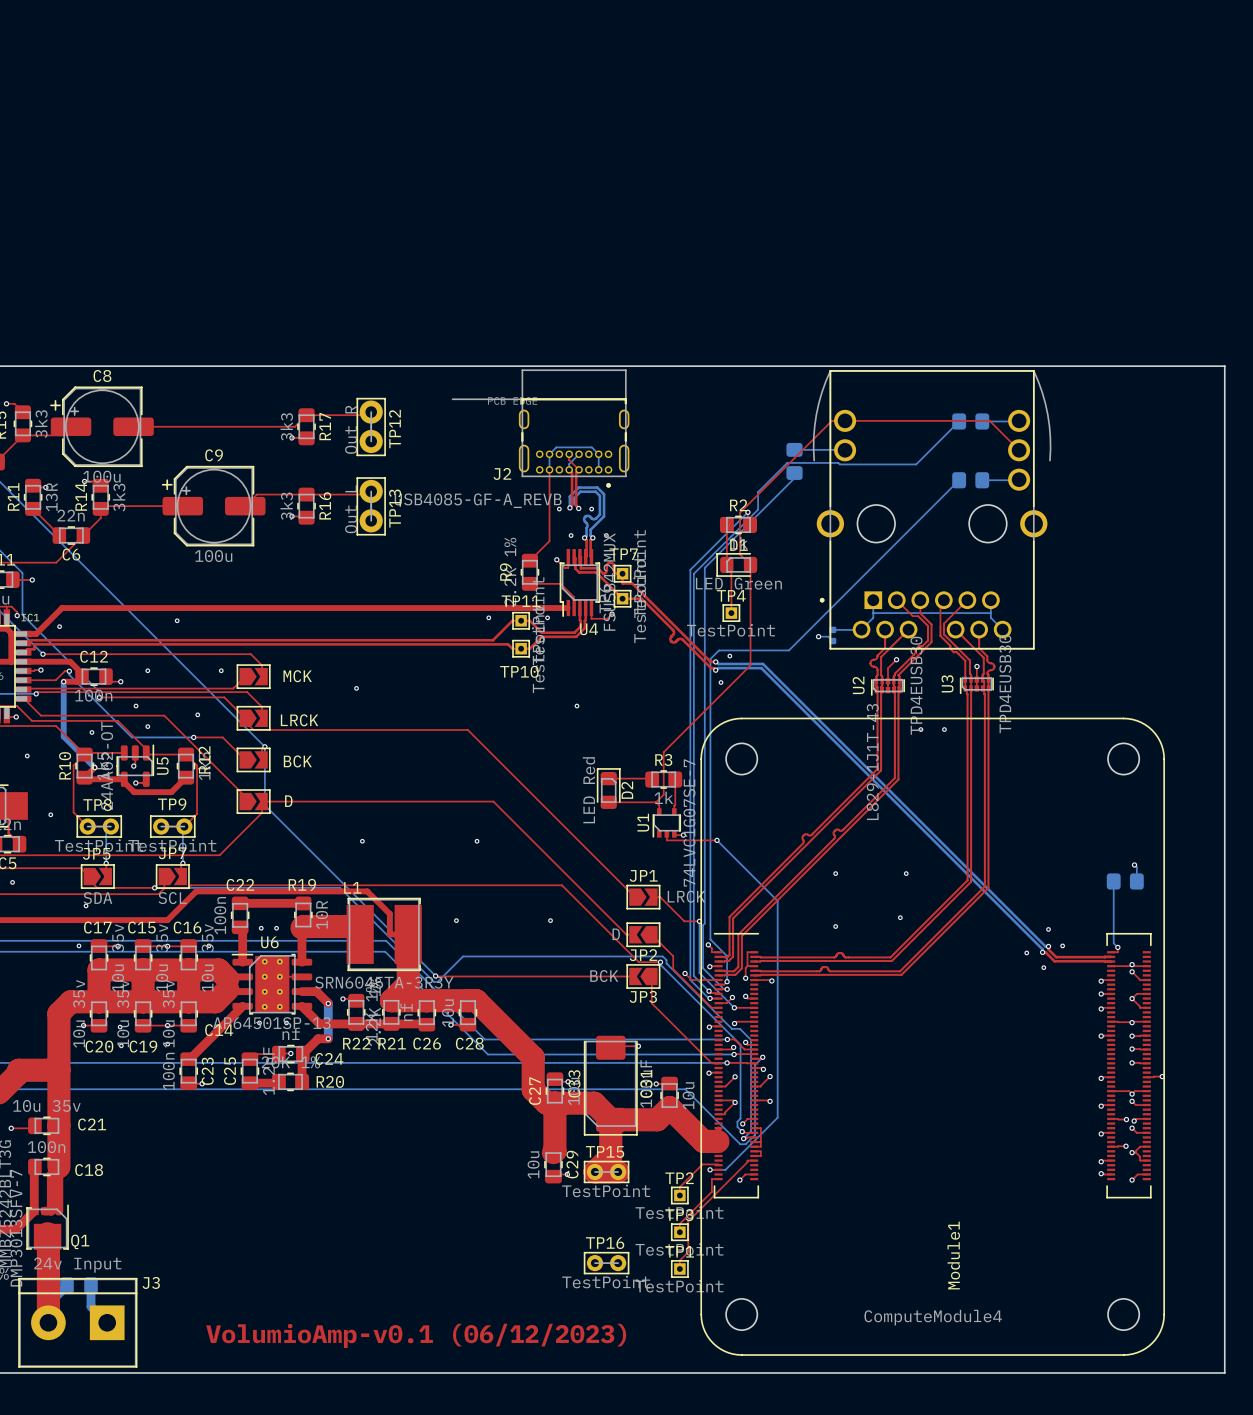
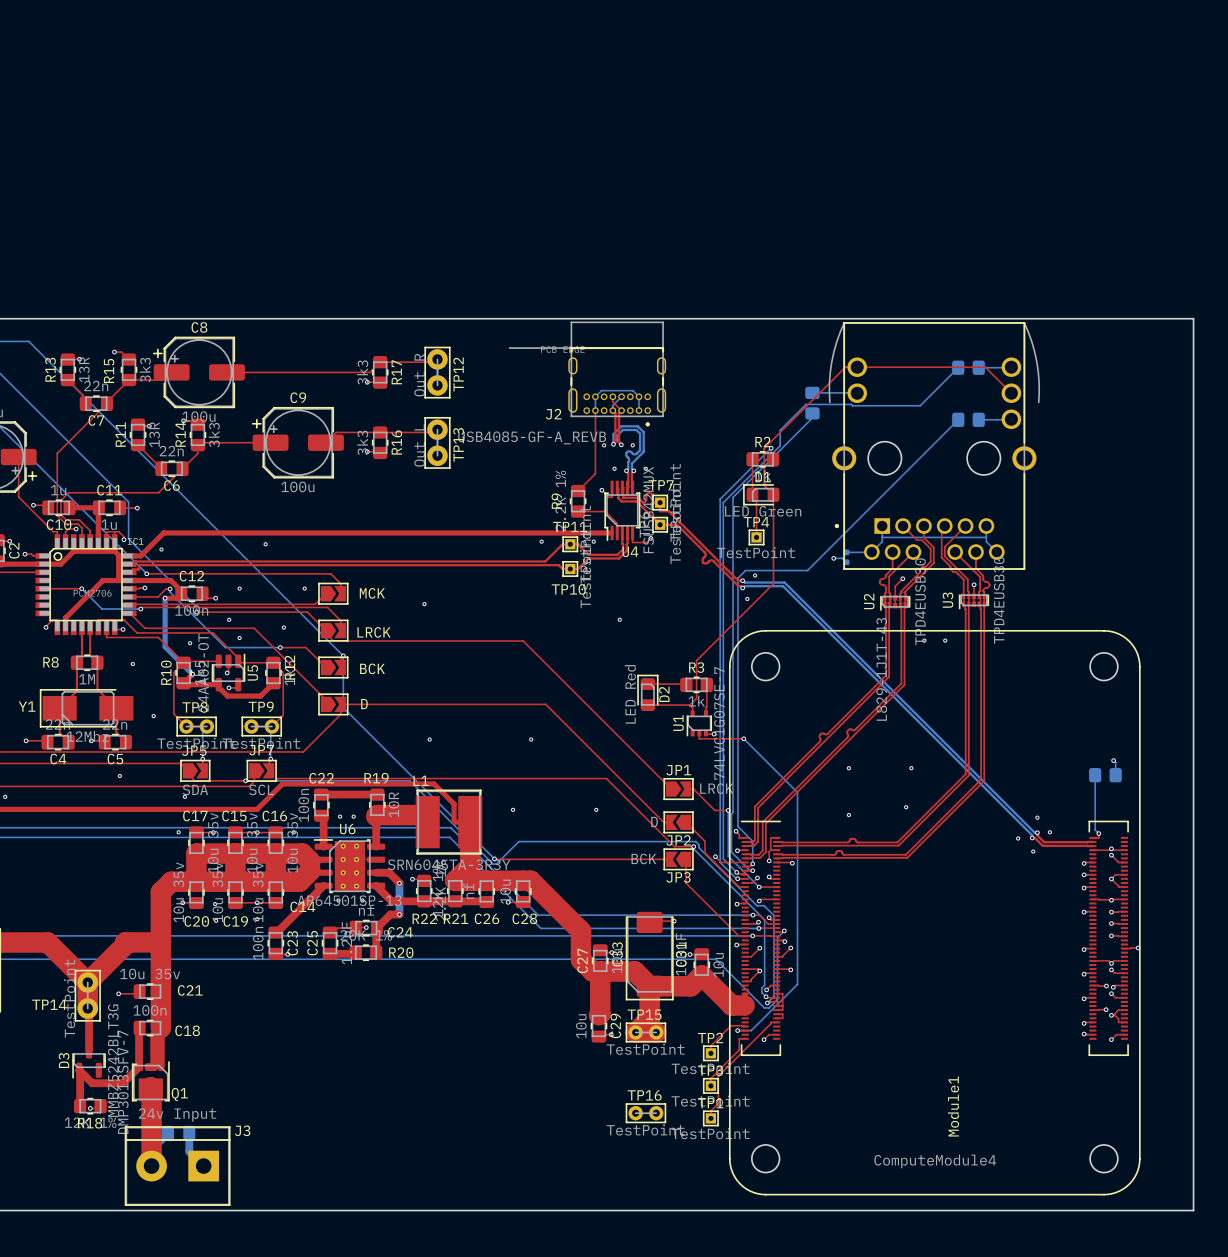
text: VolumioAmp-v0.1 (06/12/2023) (416, 1335) -> none

